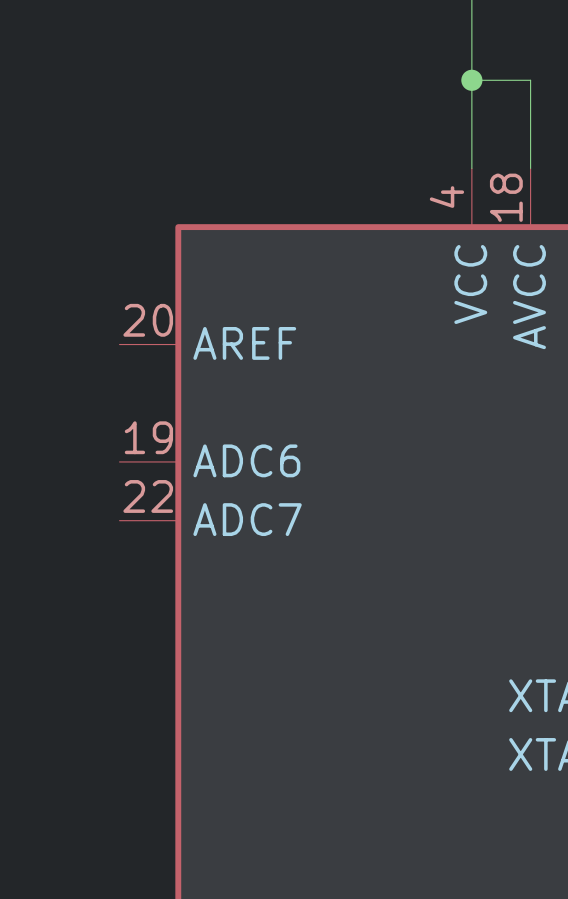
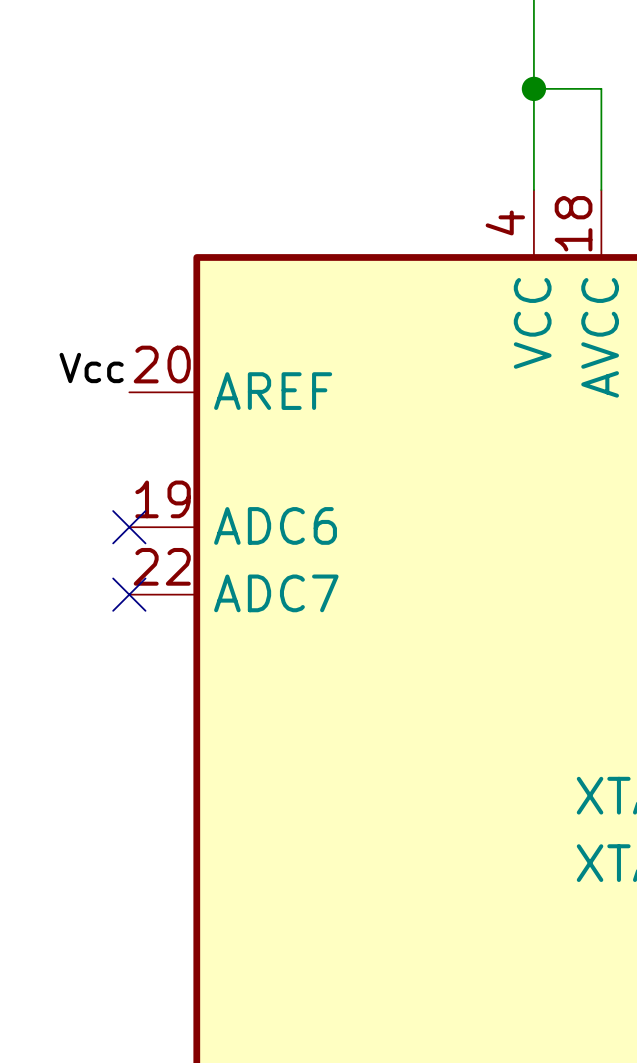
label: none -> Vcc (91, 367)
no-connect mark: none -> (129, 527)
no-connect mark: none -> (129, 594)

